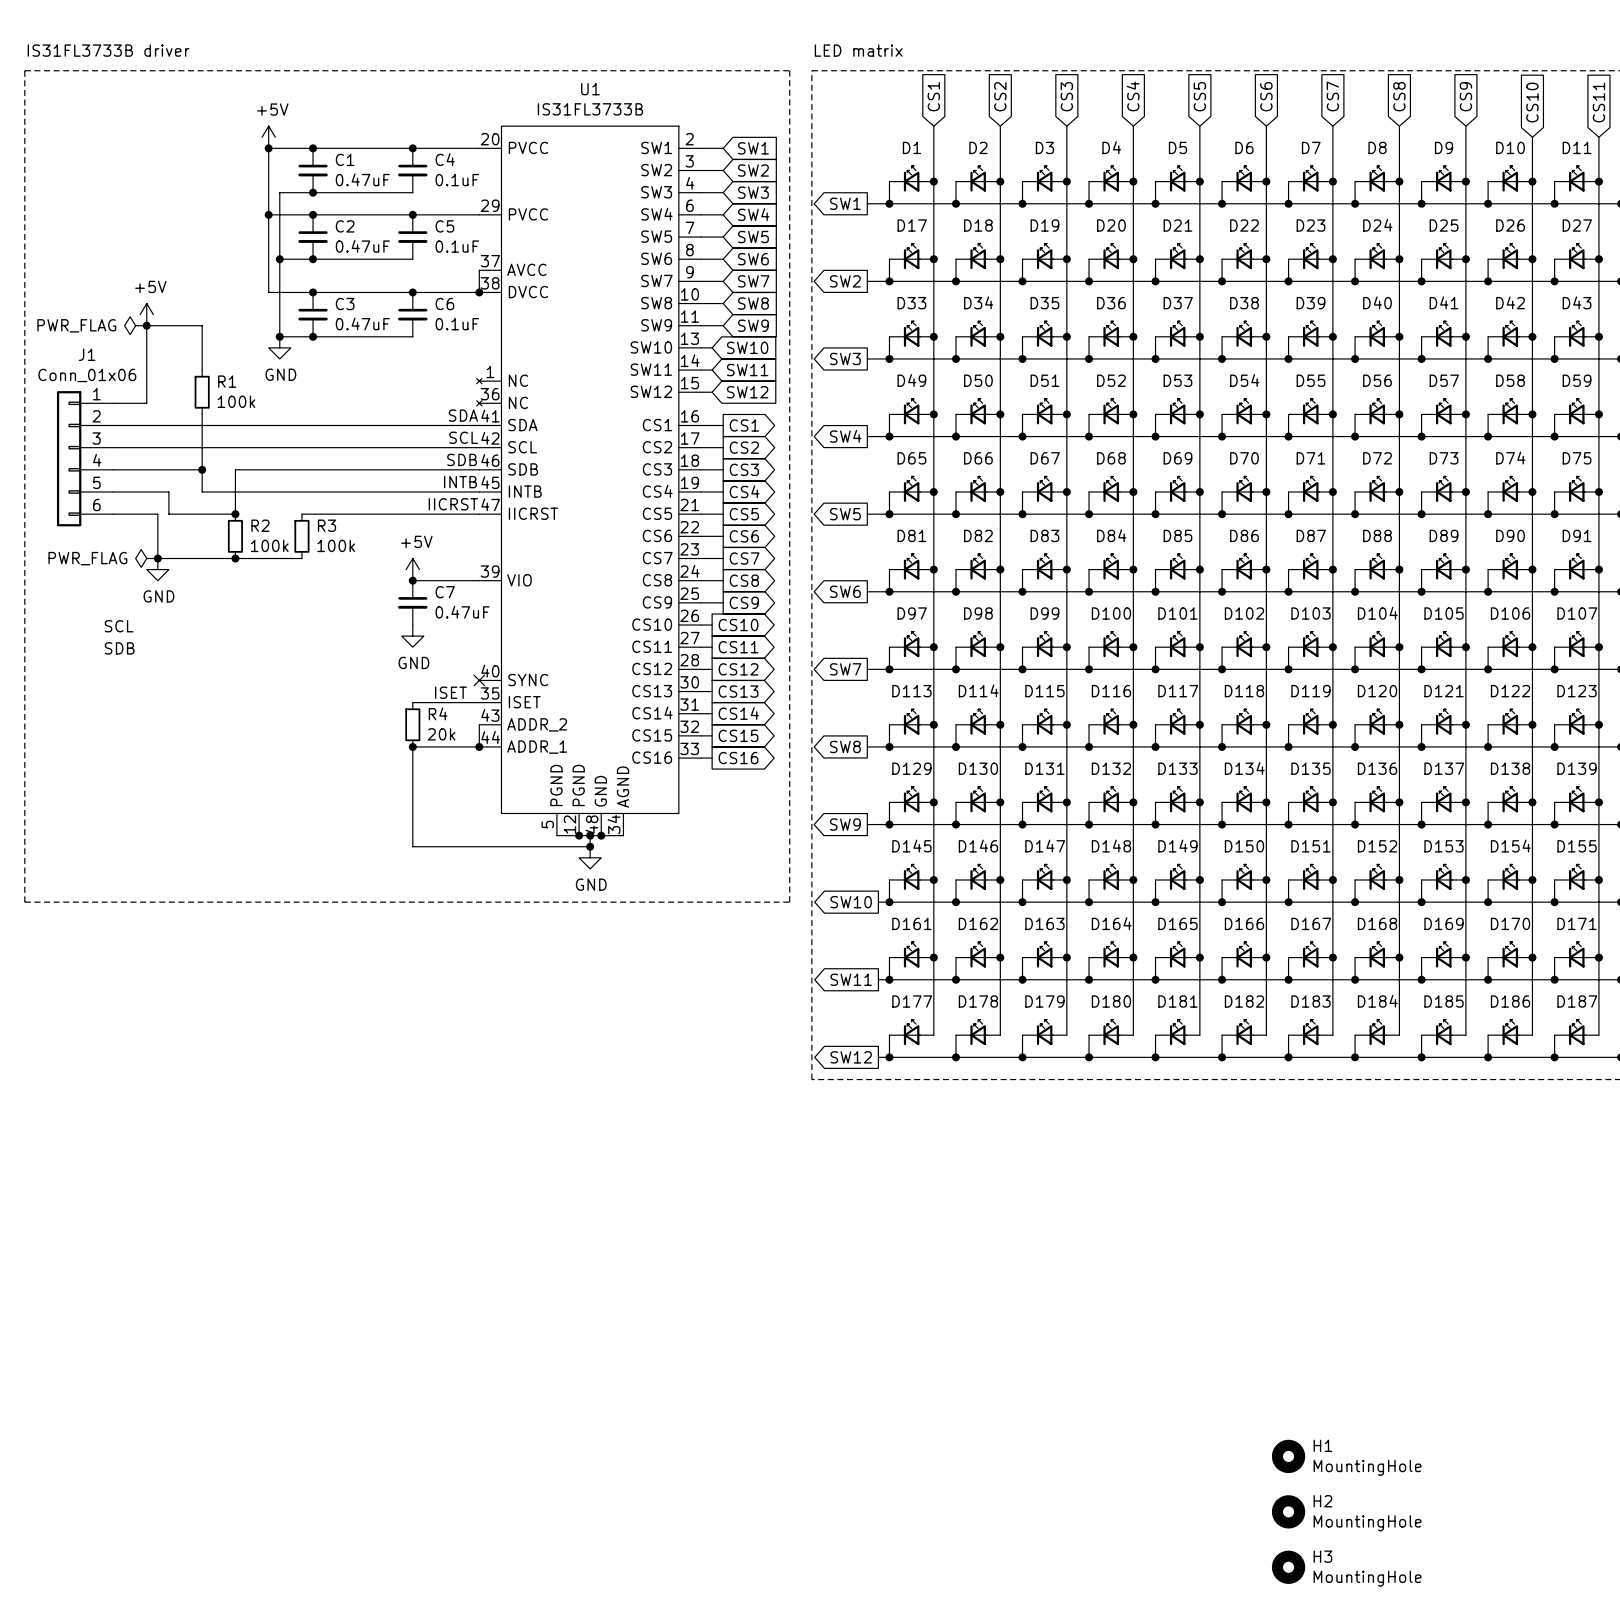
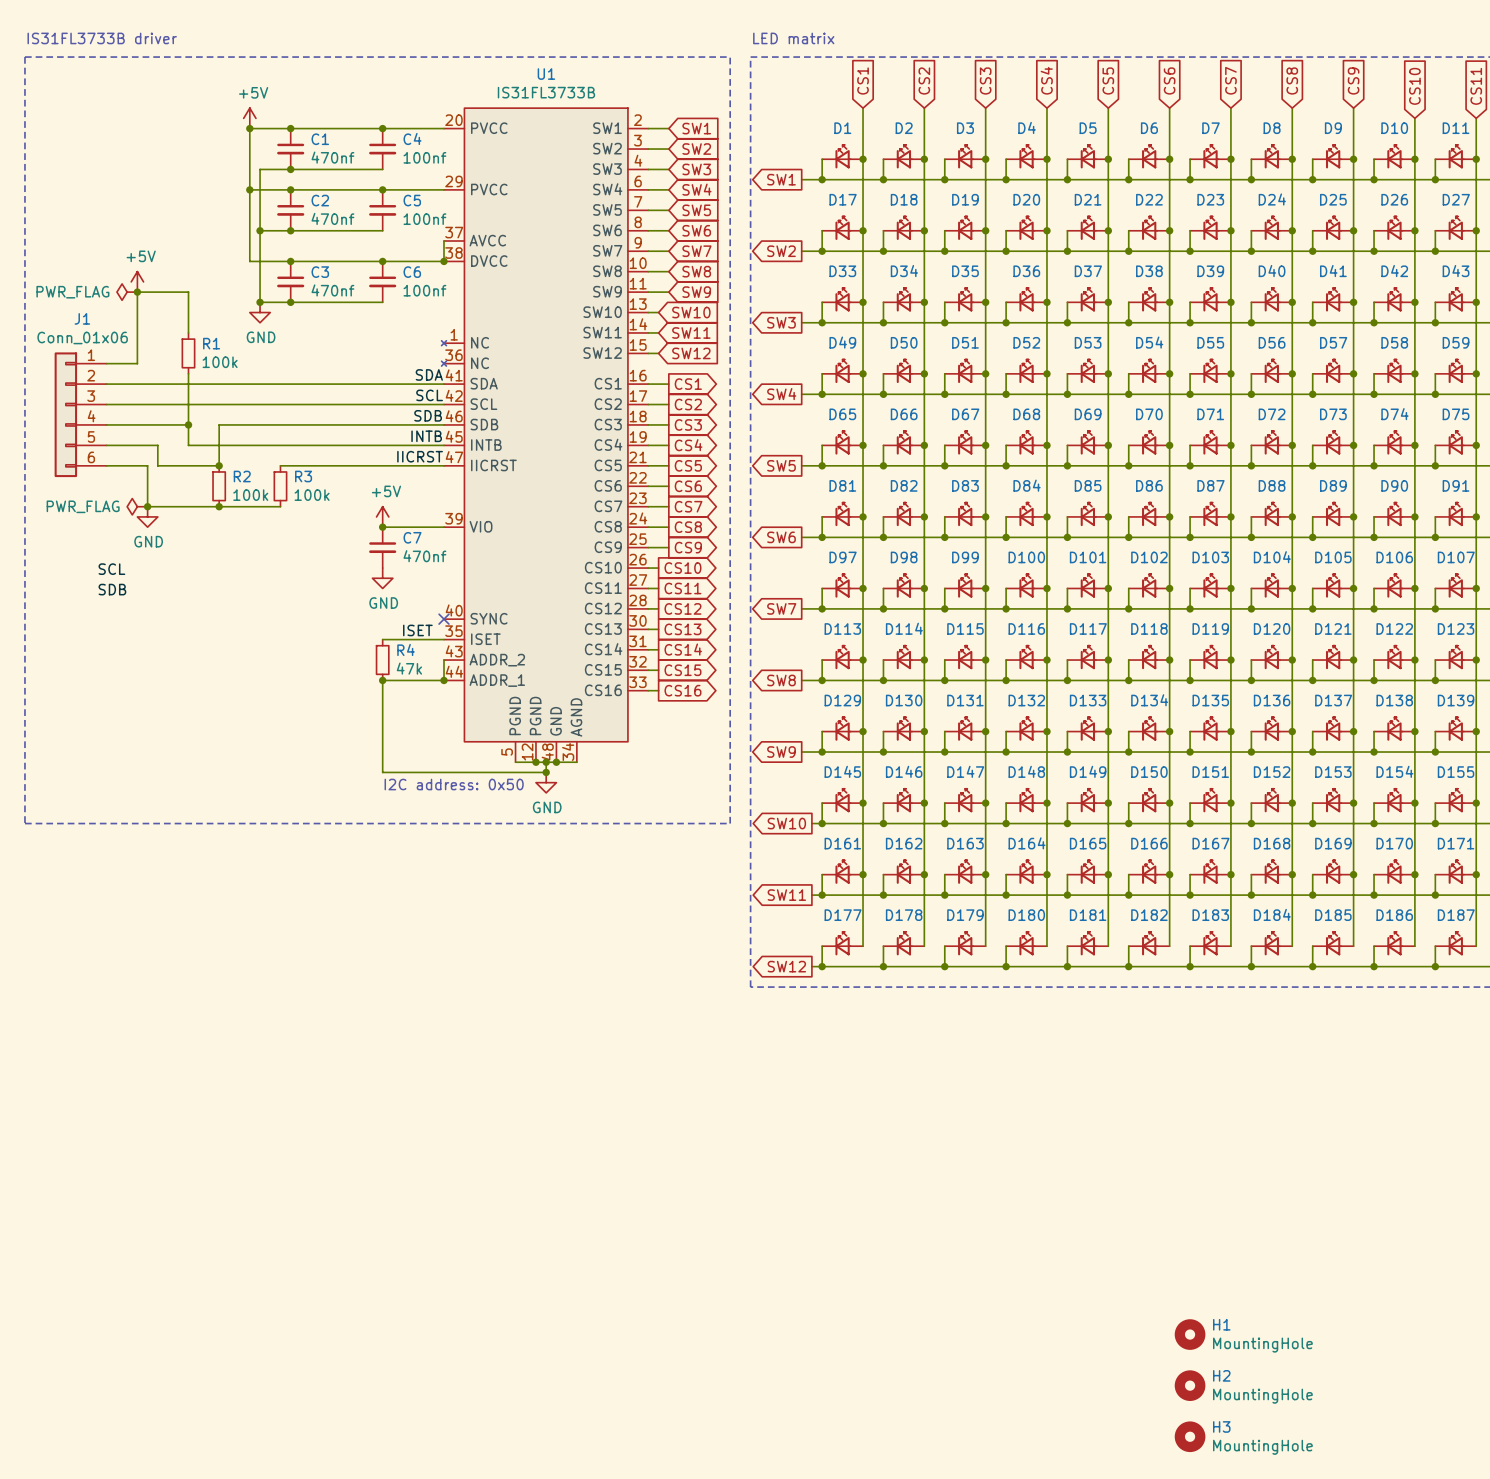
C1 value: 0.47uF (362, 179) -> 470nf (332, 157)
C4 value: 0.1uF (457, 180) -> 100nf (424, 157)
C2 value: 0.47uF (362, 246) -> 470nf (332, 218)
C5 value: 0.1uF (457, 246) -> 100nf (424, 219)
C3 value: 0.47uF (362, 323) -> 470nf (332, 290)
C6 value: 0.1uF (457, 324) -> 100nf (424, 290)
C7 value: 0.47uF (462, 612) -> 470nf (424, 556)
R4 value: 20k (441, 734) -> 47k (409, 668)
text: none -> I2C address: 0x50 (454, 784)

